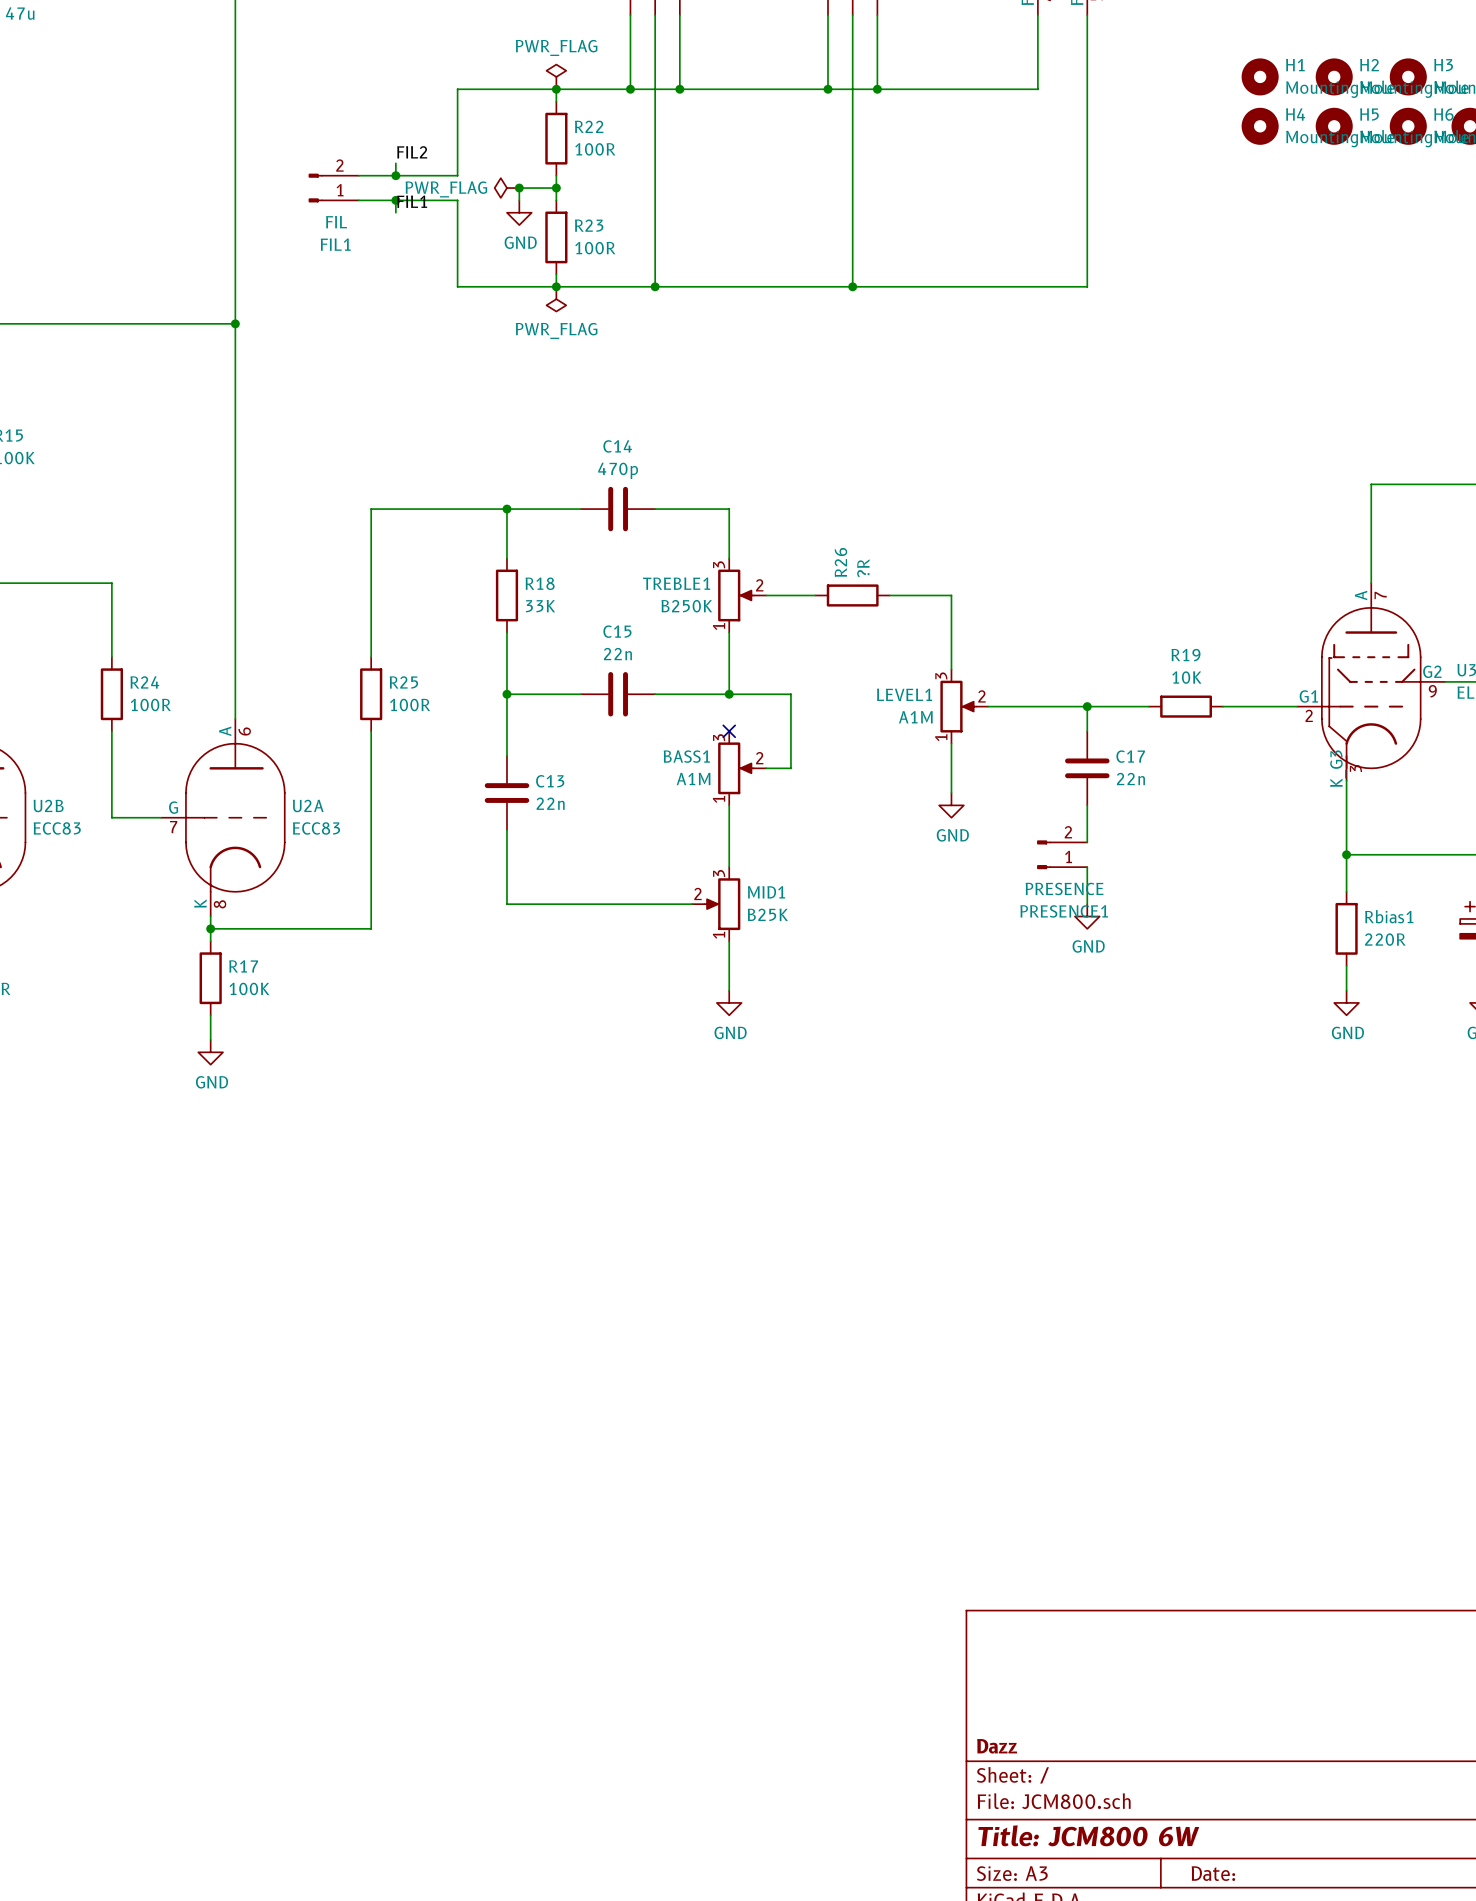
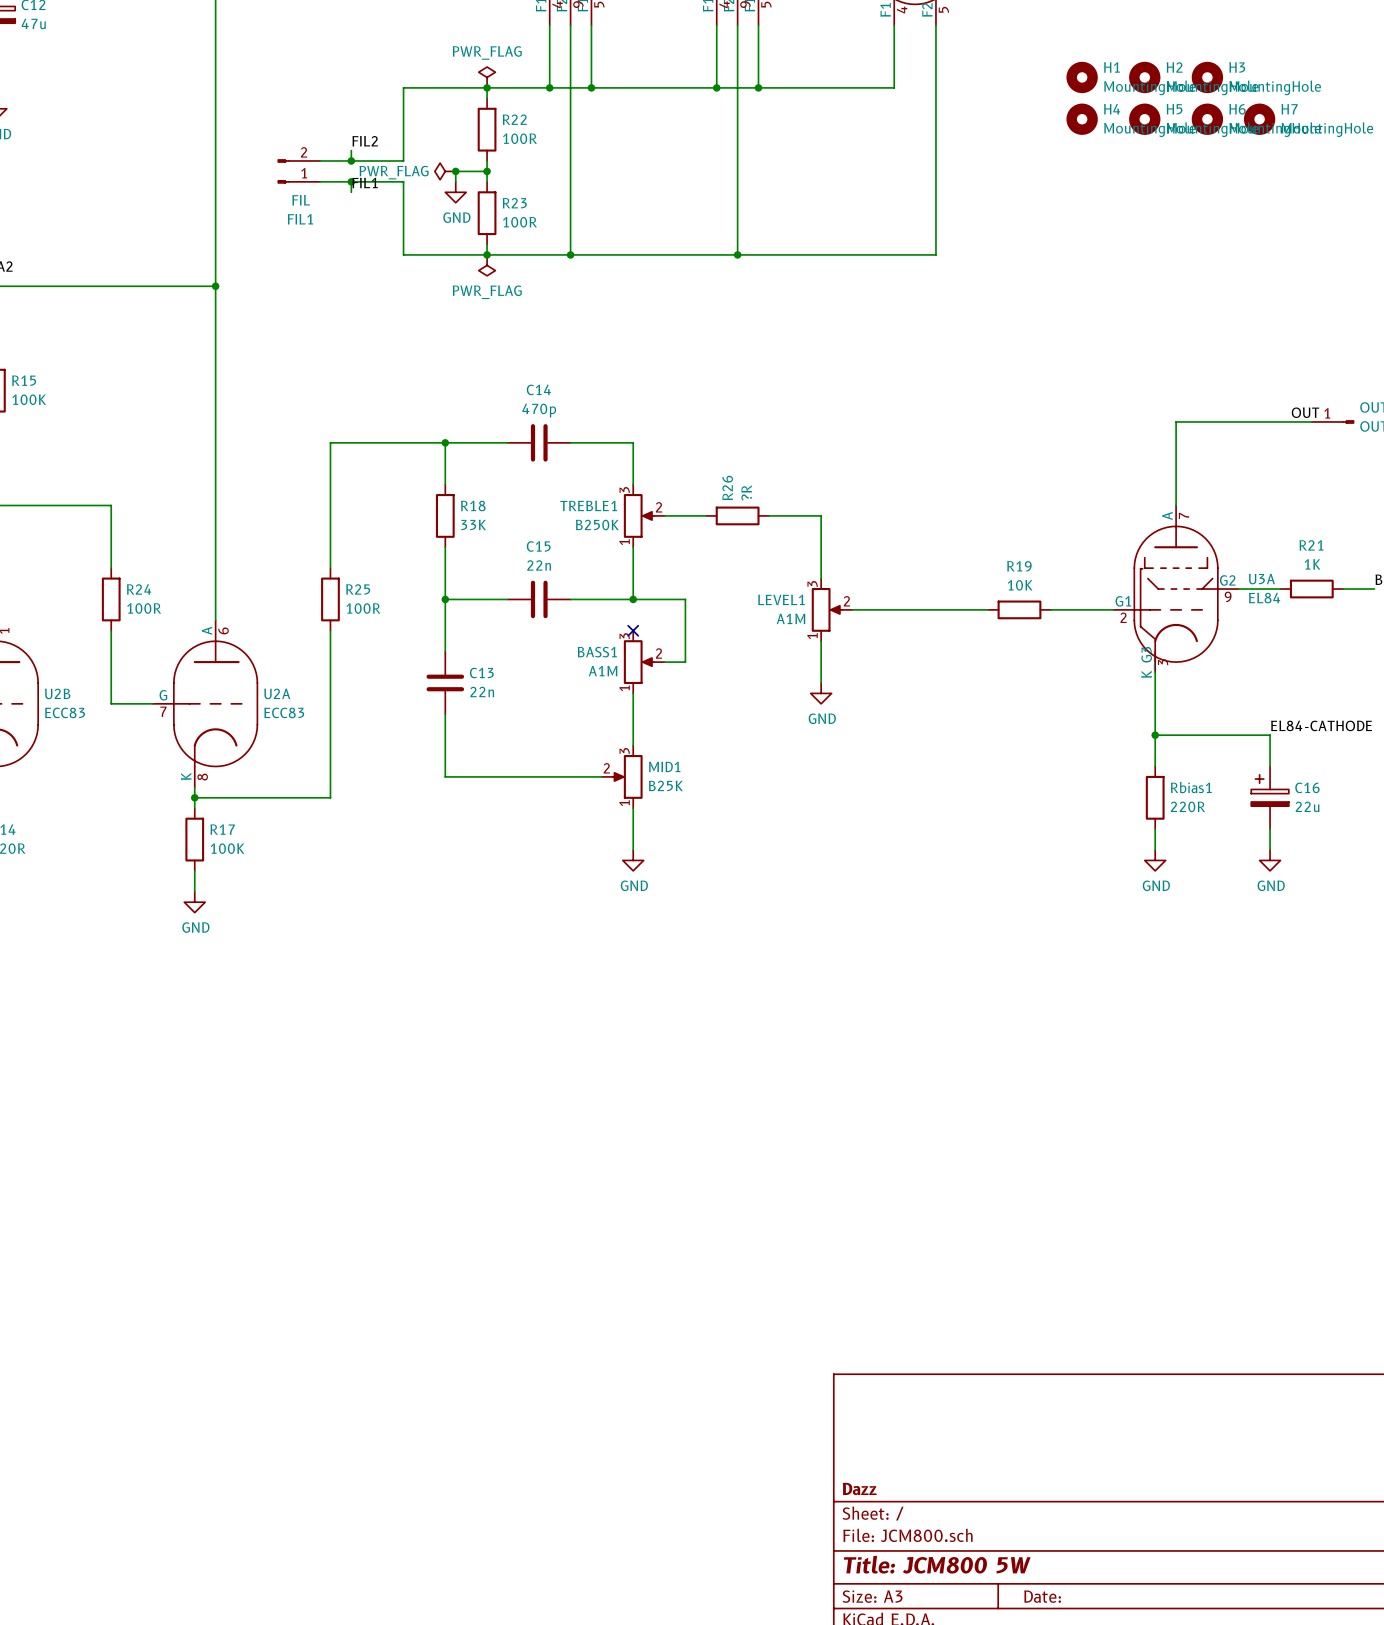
wire: (1087, 706) (1087, 731) -> none
junction: (1087, 706) -> none
C17: 22n (1087, 768) -> none
wire: (1087, 805) (1087, 842) -> none
PRESENCE1: PRESENCE (1062, 854) -> none
wire: (1087, 867) (1087, 904) -> none
power symbol: GND (1087, 916) -> none
title block: Title: JCM800 6W (1088, 1835) -> Title: JCM800 5W (937, 1564)

